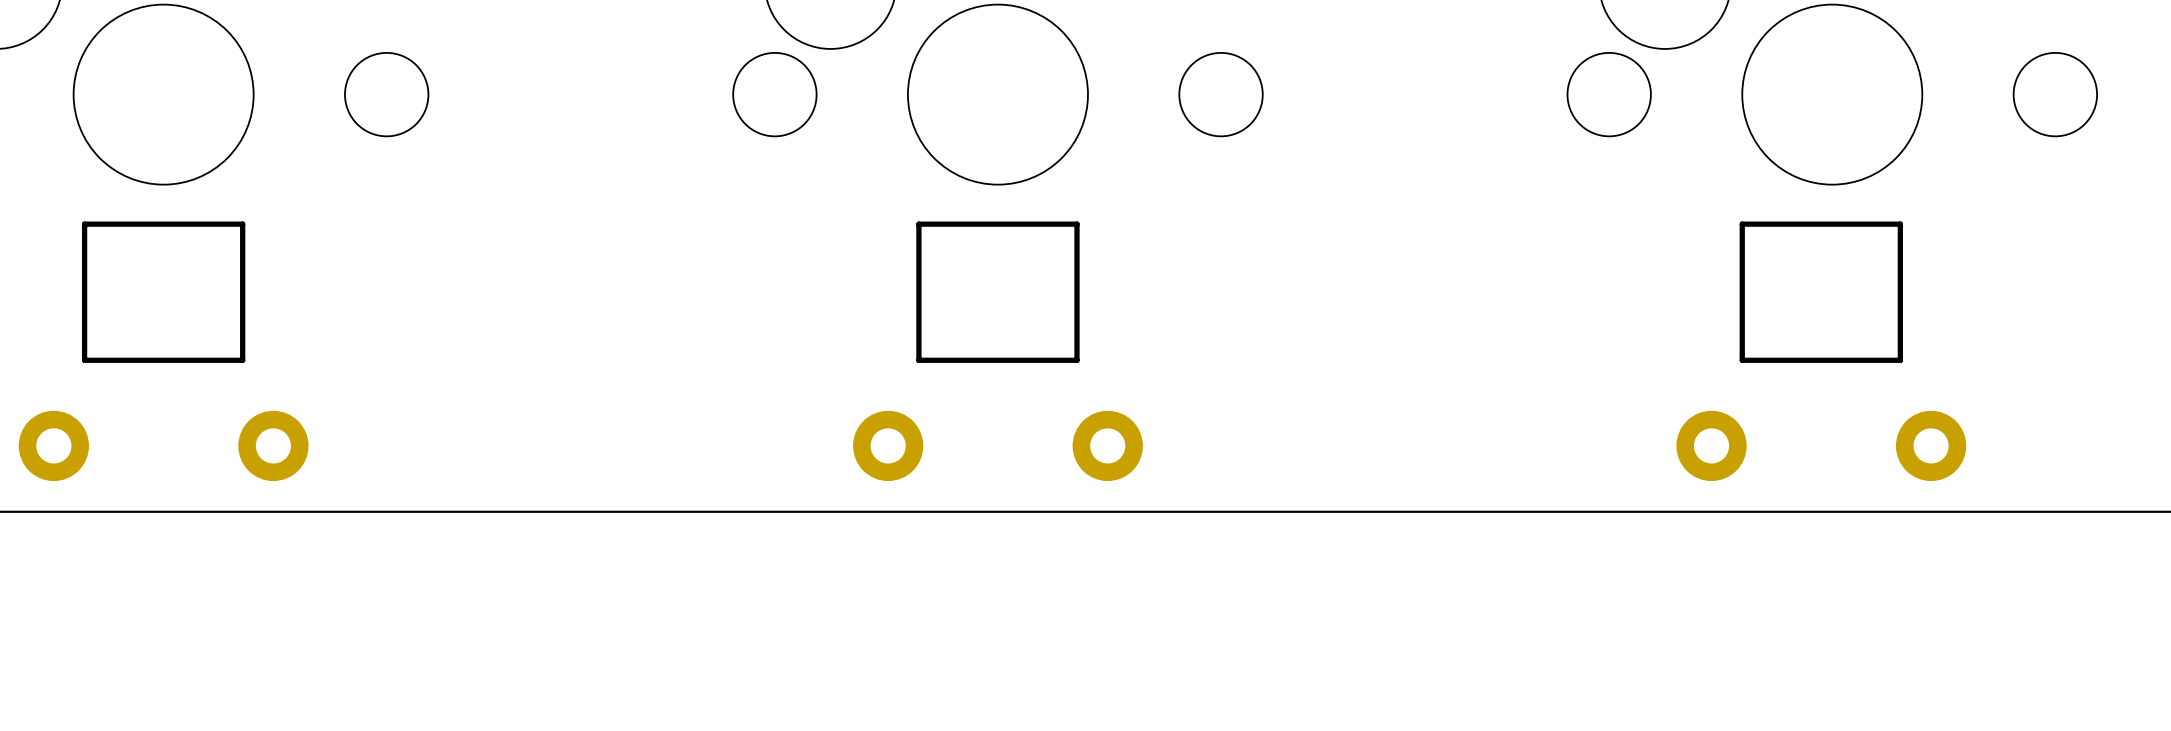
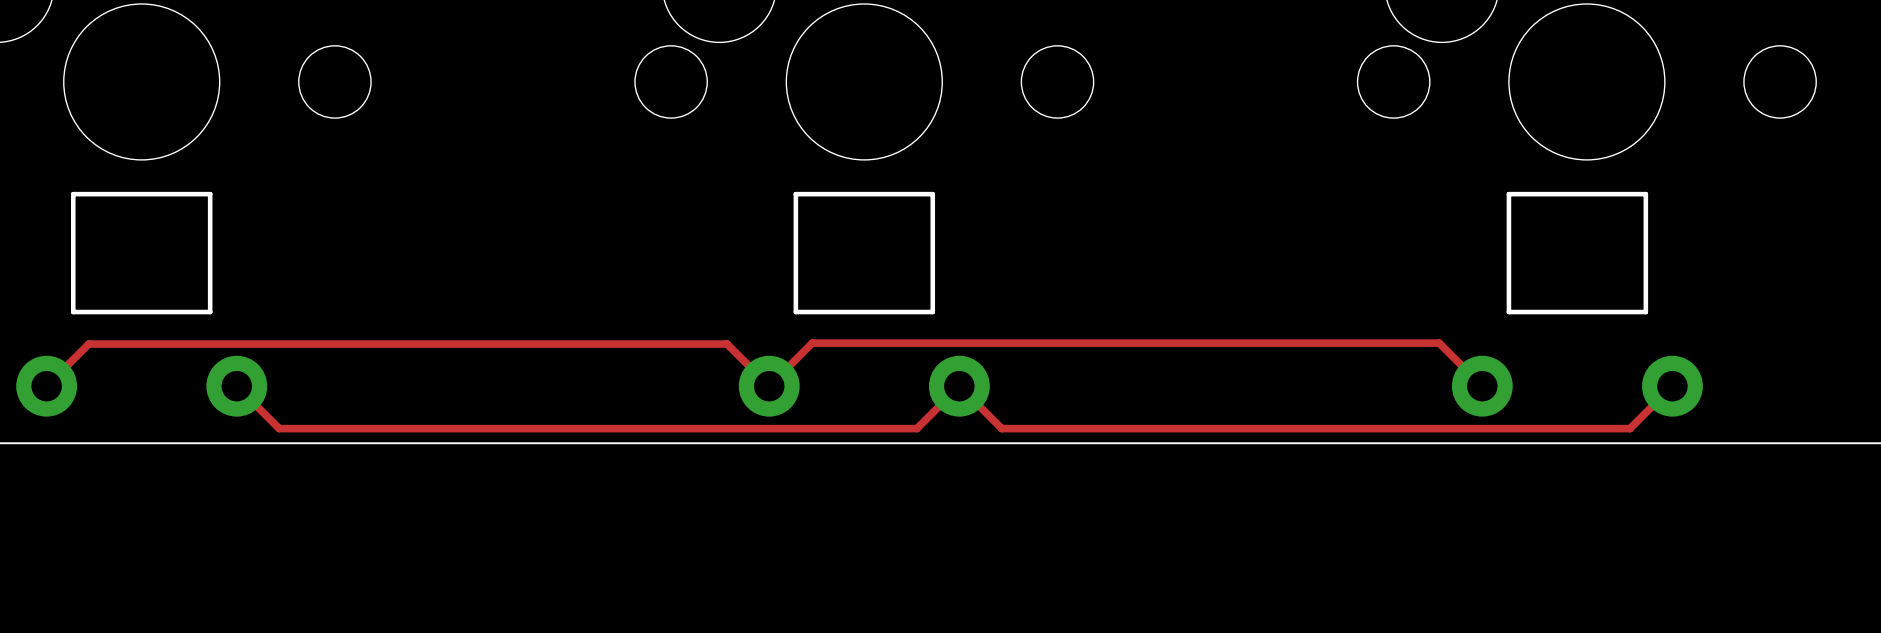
track: none -> (46, 386) (88, 344) (727, 344) (769, 386) (812, 343) (1439, 343) (1482, 386)
track: none -> (236, 386) (279, 428) (916, 428) (959, 386) (1001, 428) (1630, 428) (1672, 386)

